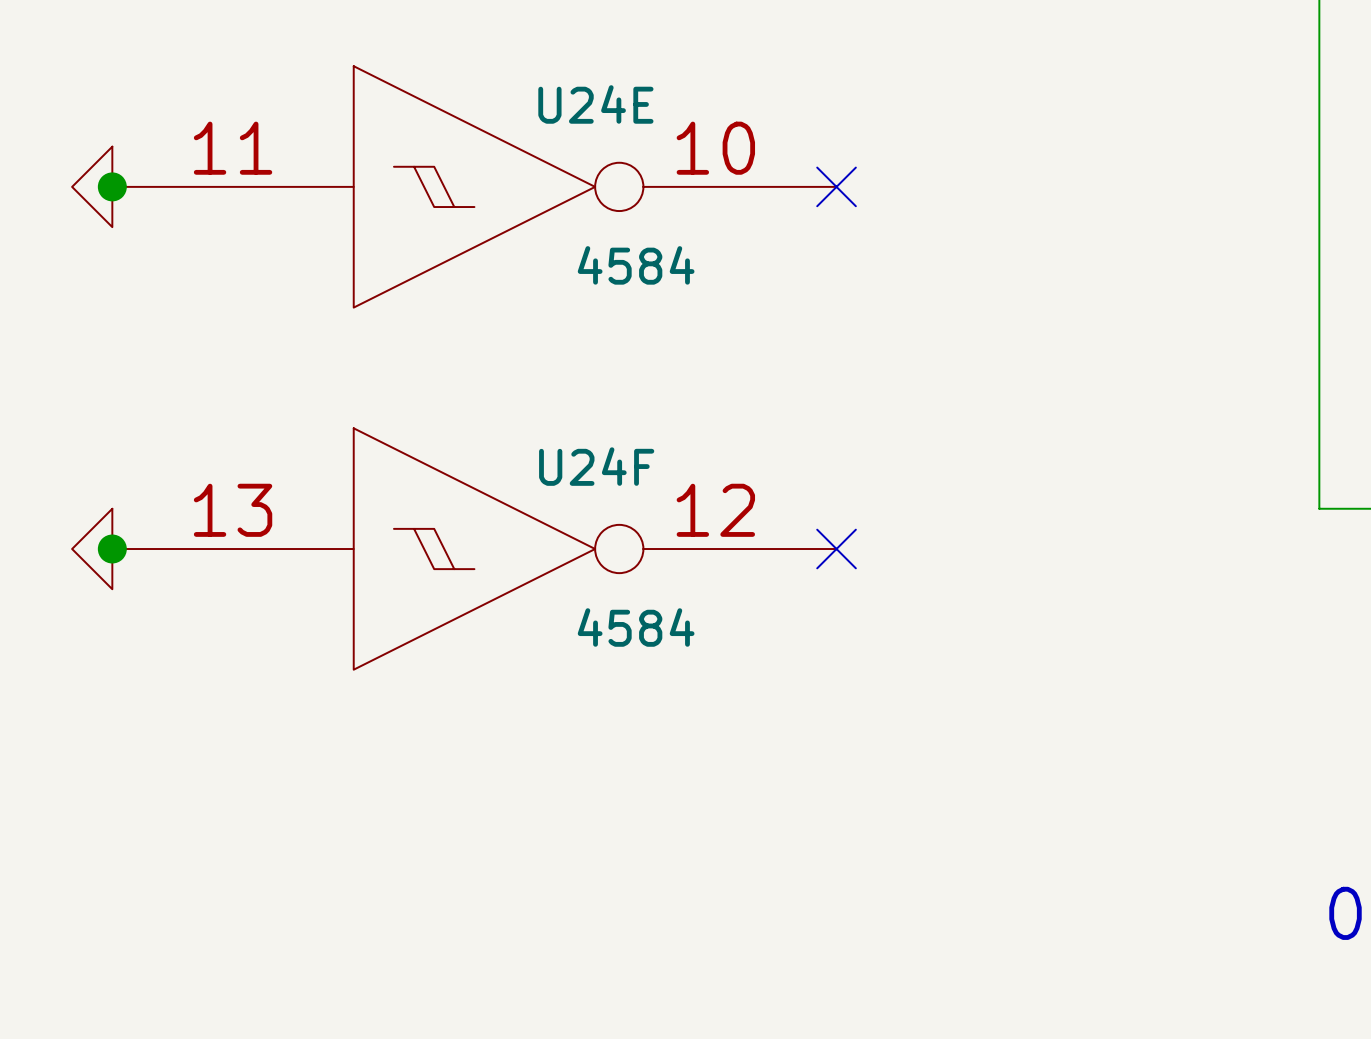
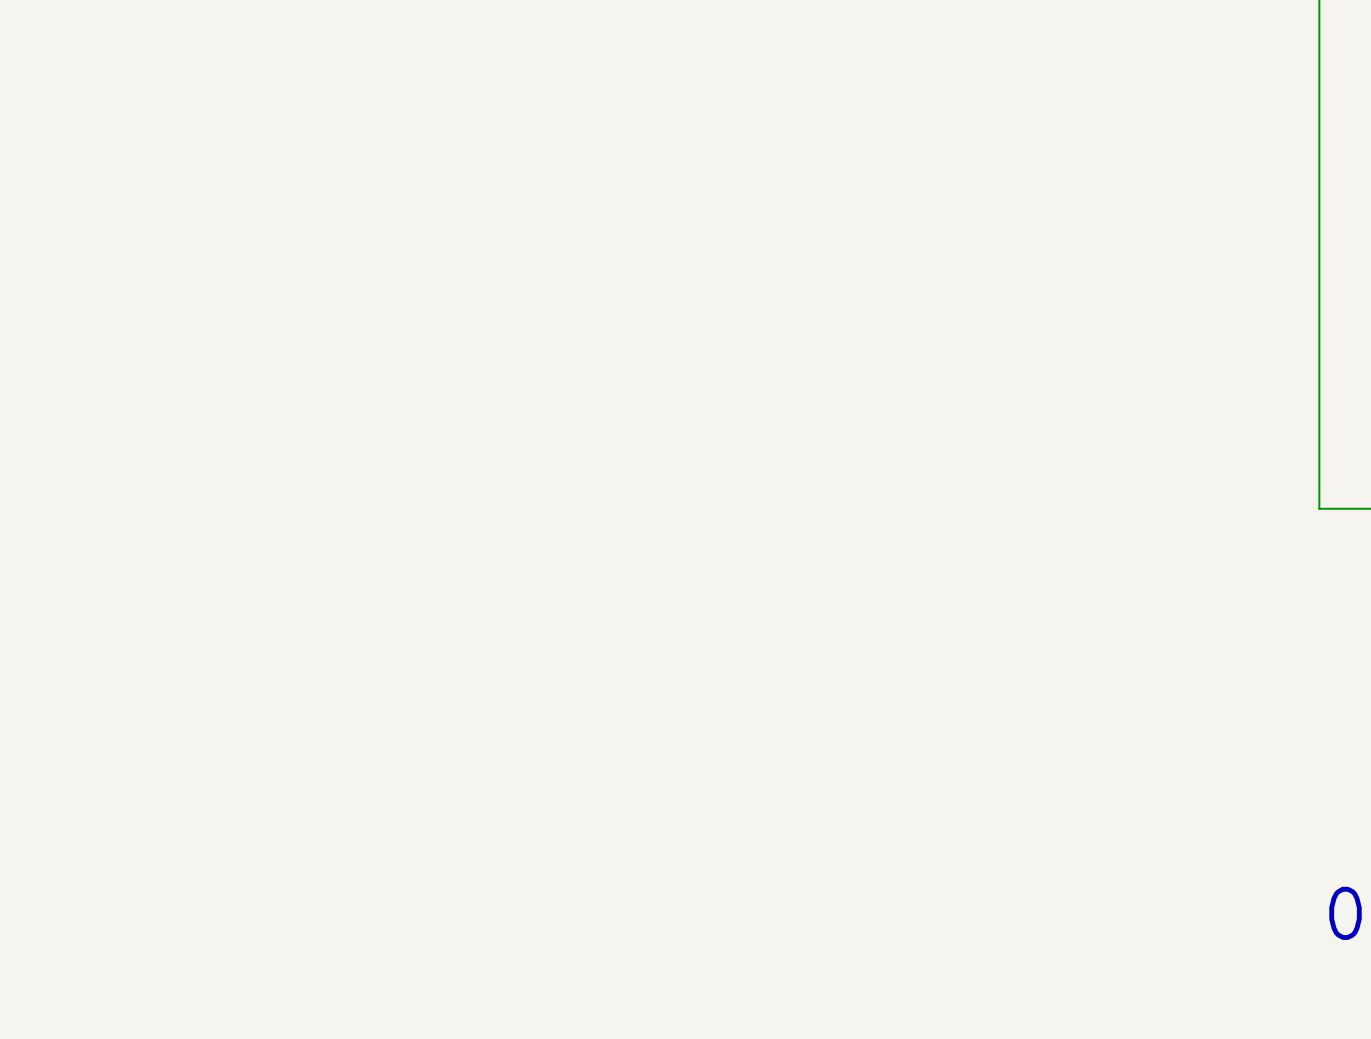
power symbol: (92, 186) -> none
junction: (112, 186) -> none
U24E: 4584 (474, 186) -> none
no-connect mark: (836, 186) -> none
power symbol: (92, 549) -> none
junction: (112, 549) -> none
U24F: 4584 (474, 549) -> none
no-connect mark: (836, 549) -> none

